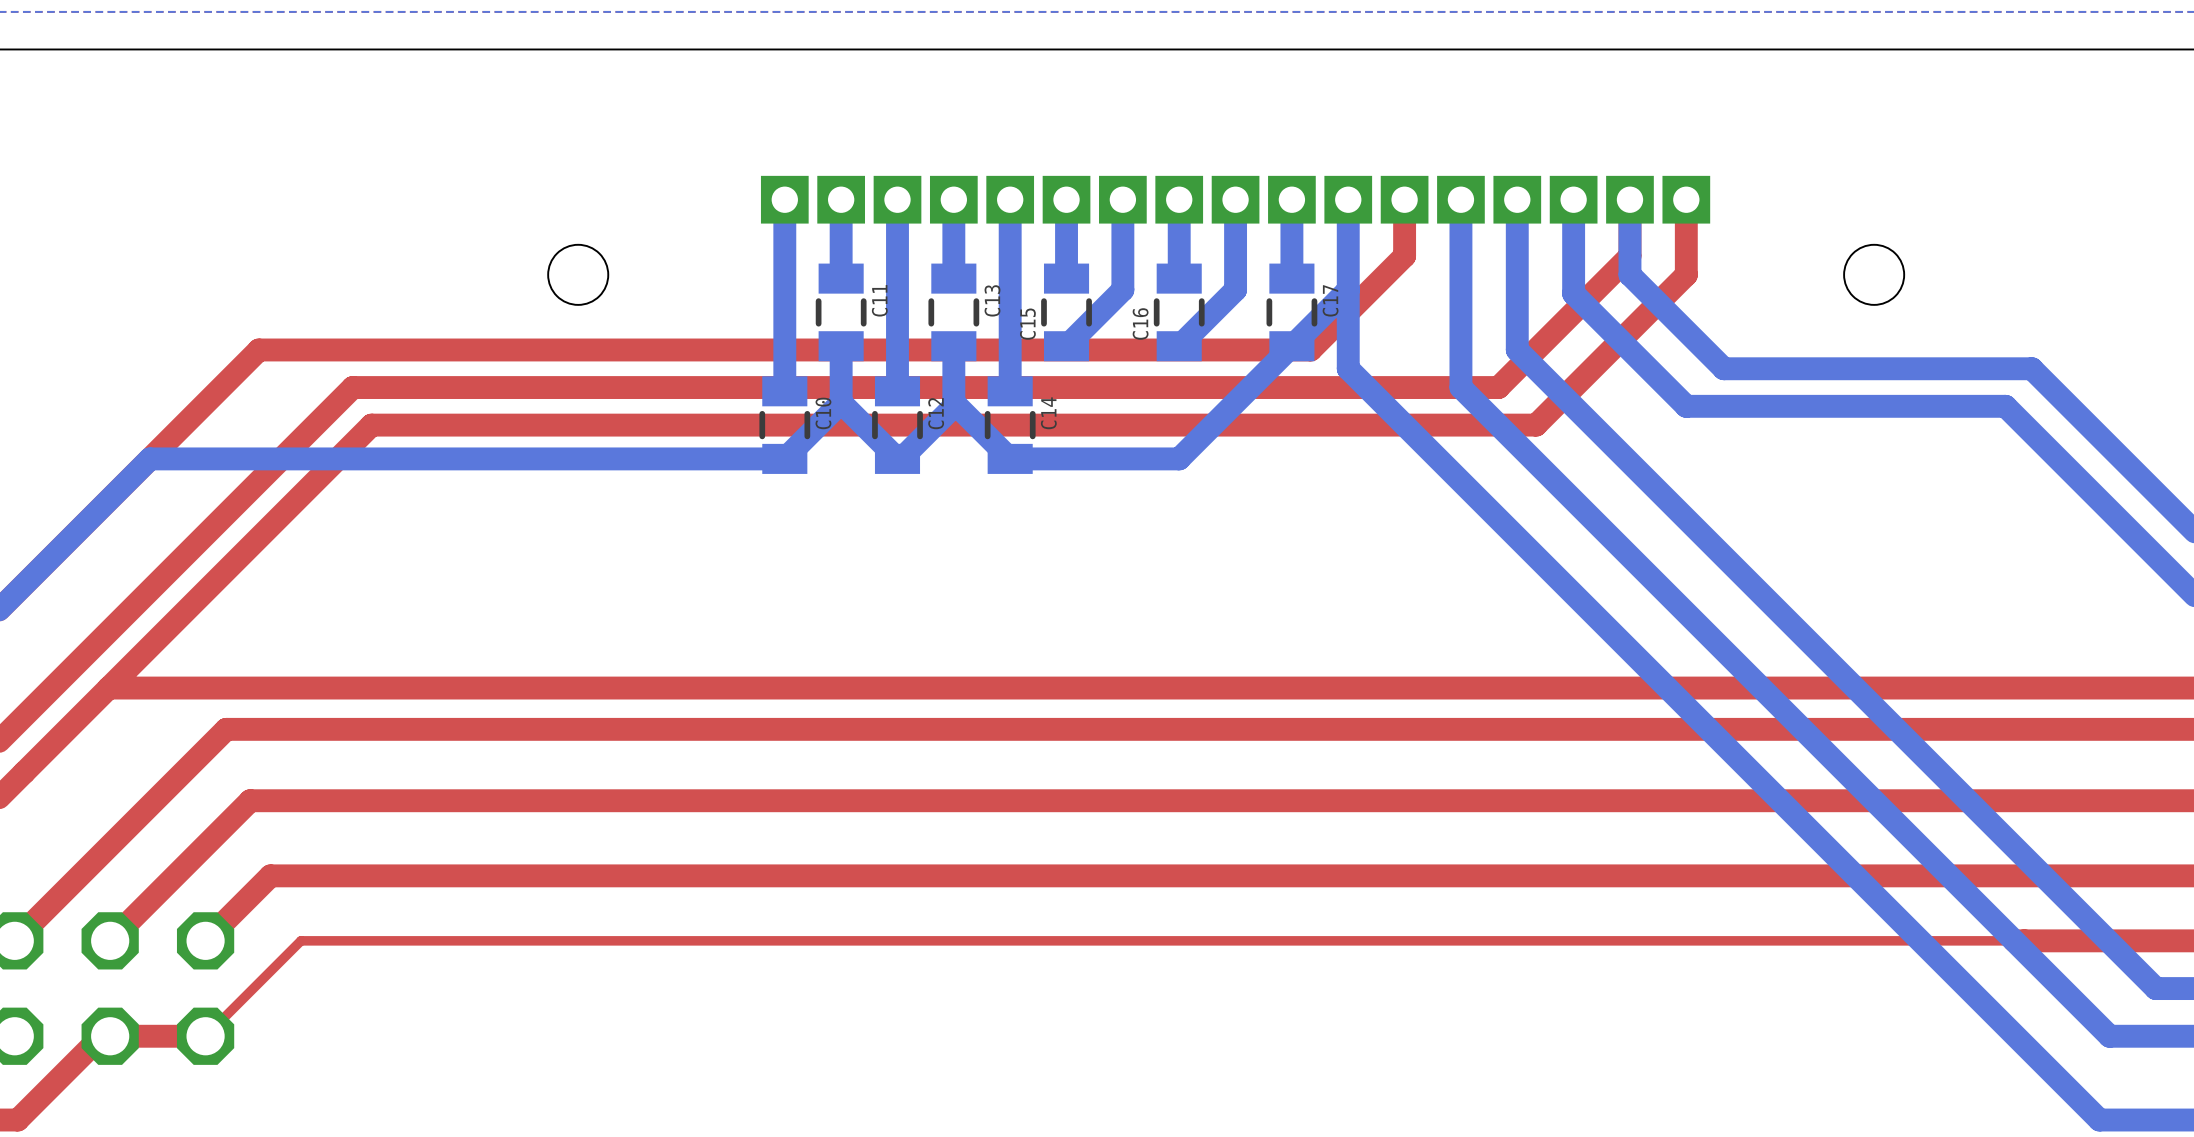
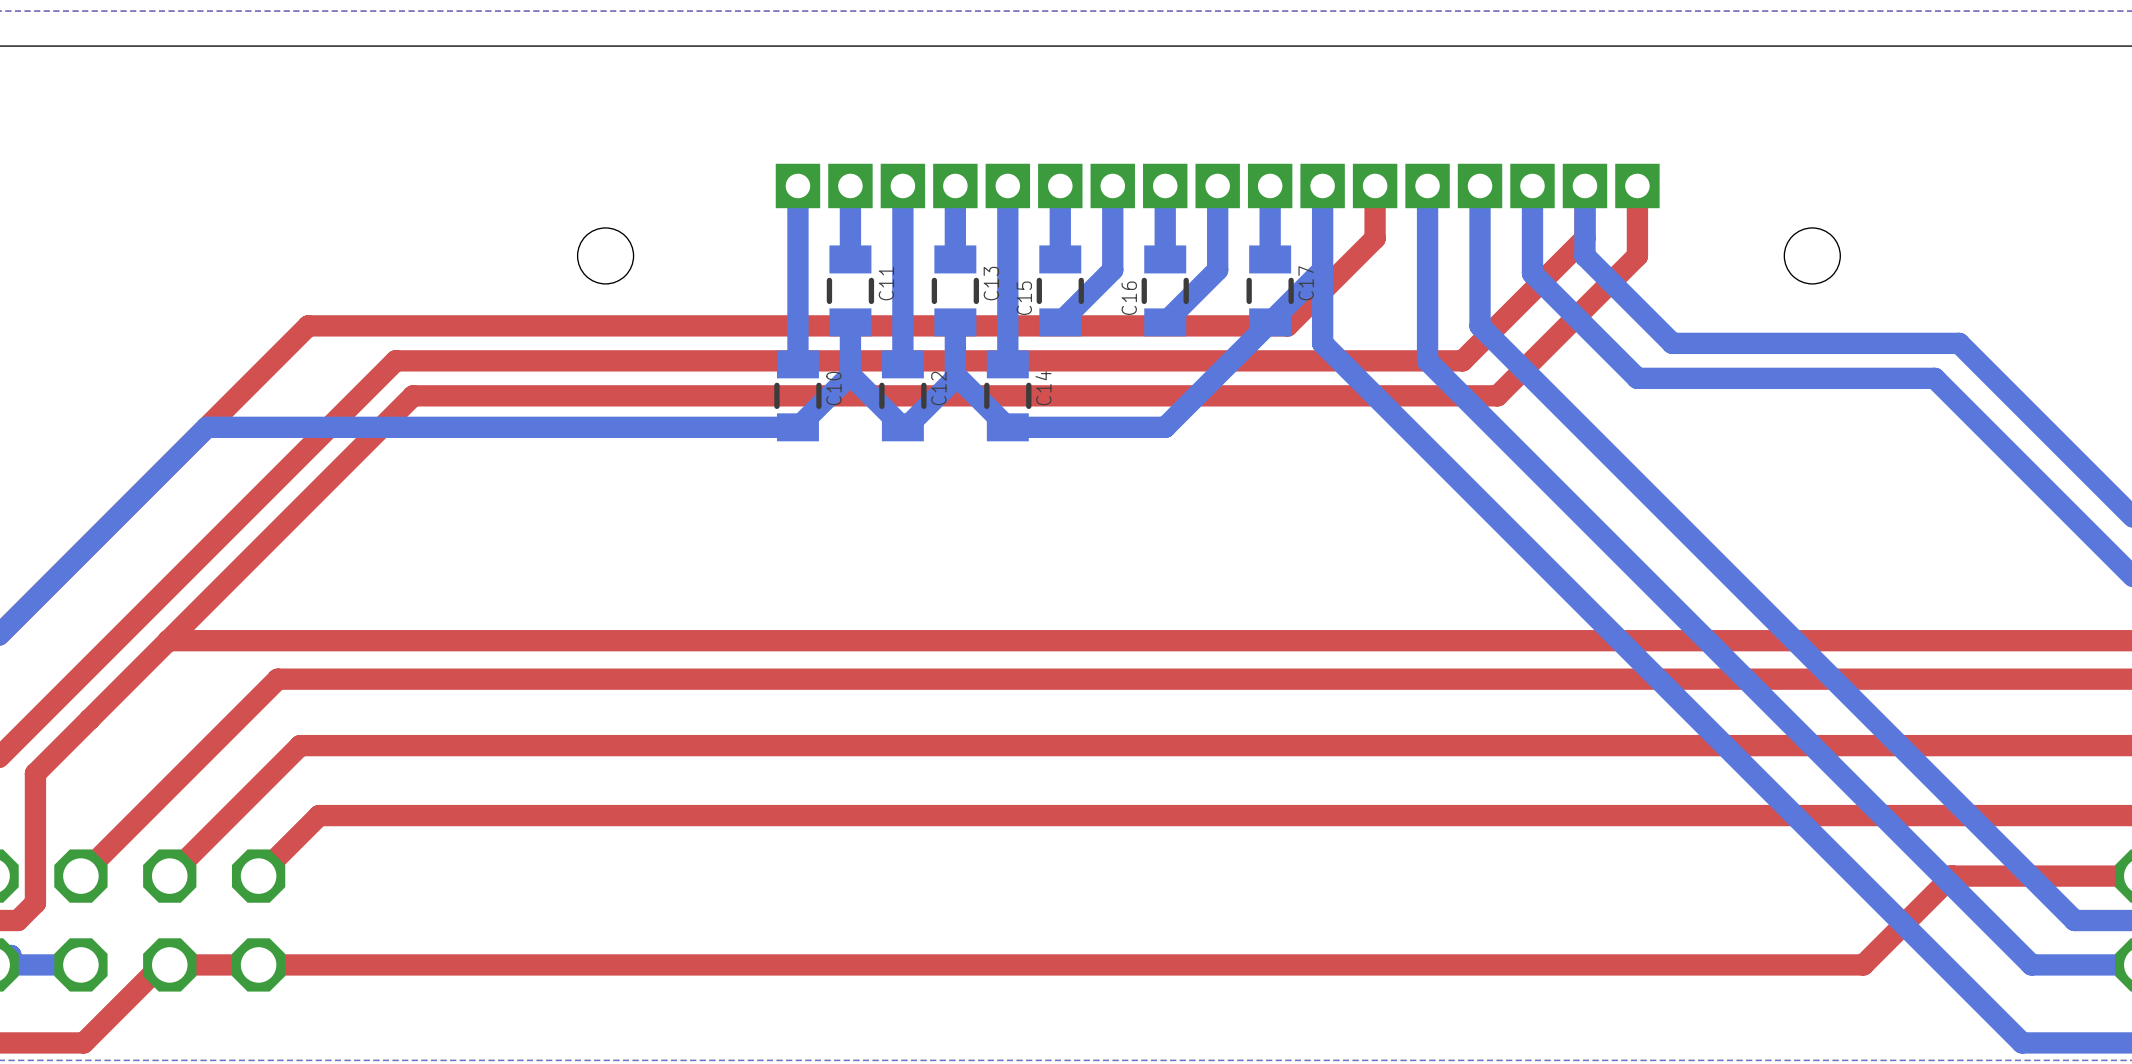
top track: (2024, 940) (300, 940) (205, 1036) -> (1952, 876) (1863, 964) (258, 964)

